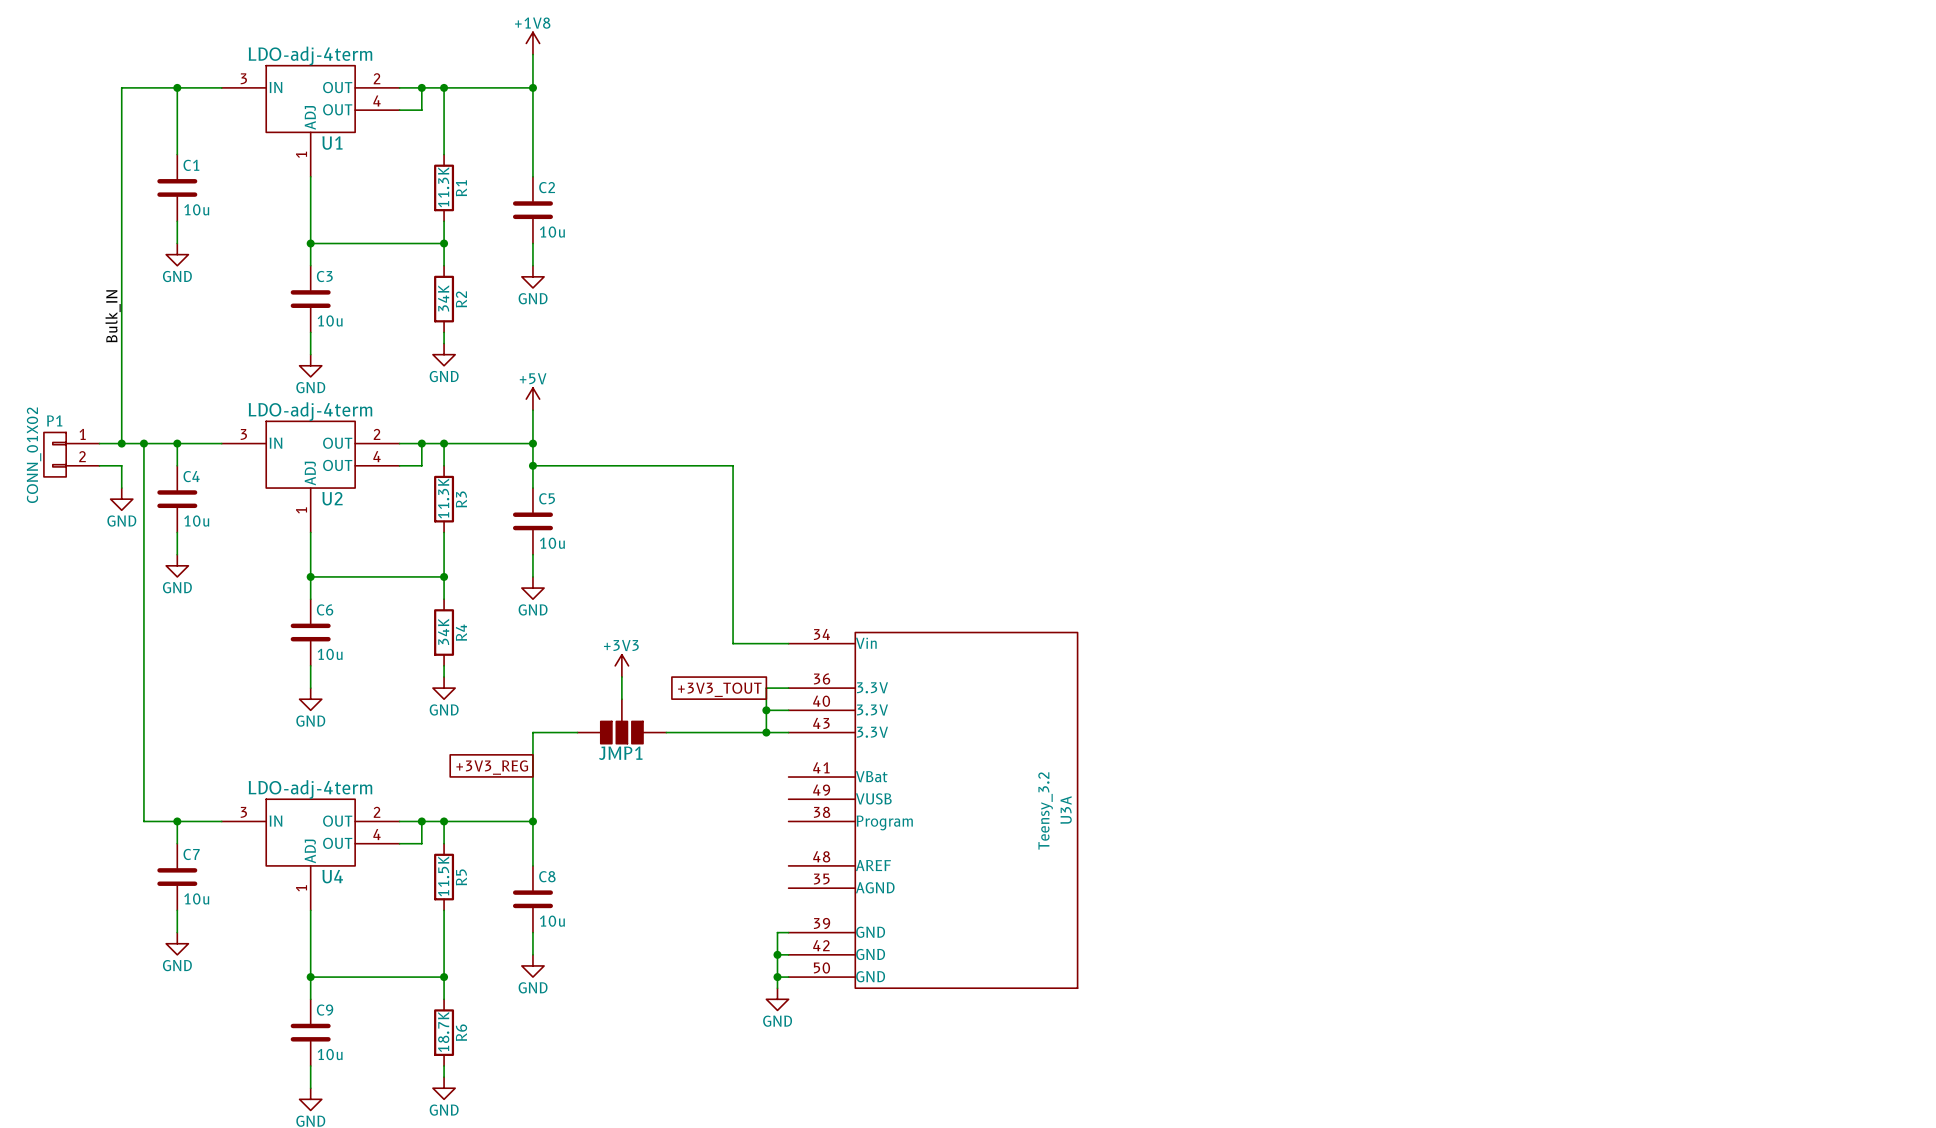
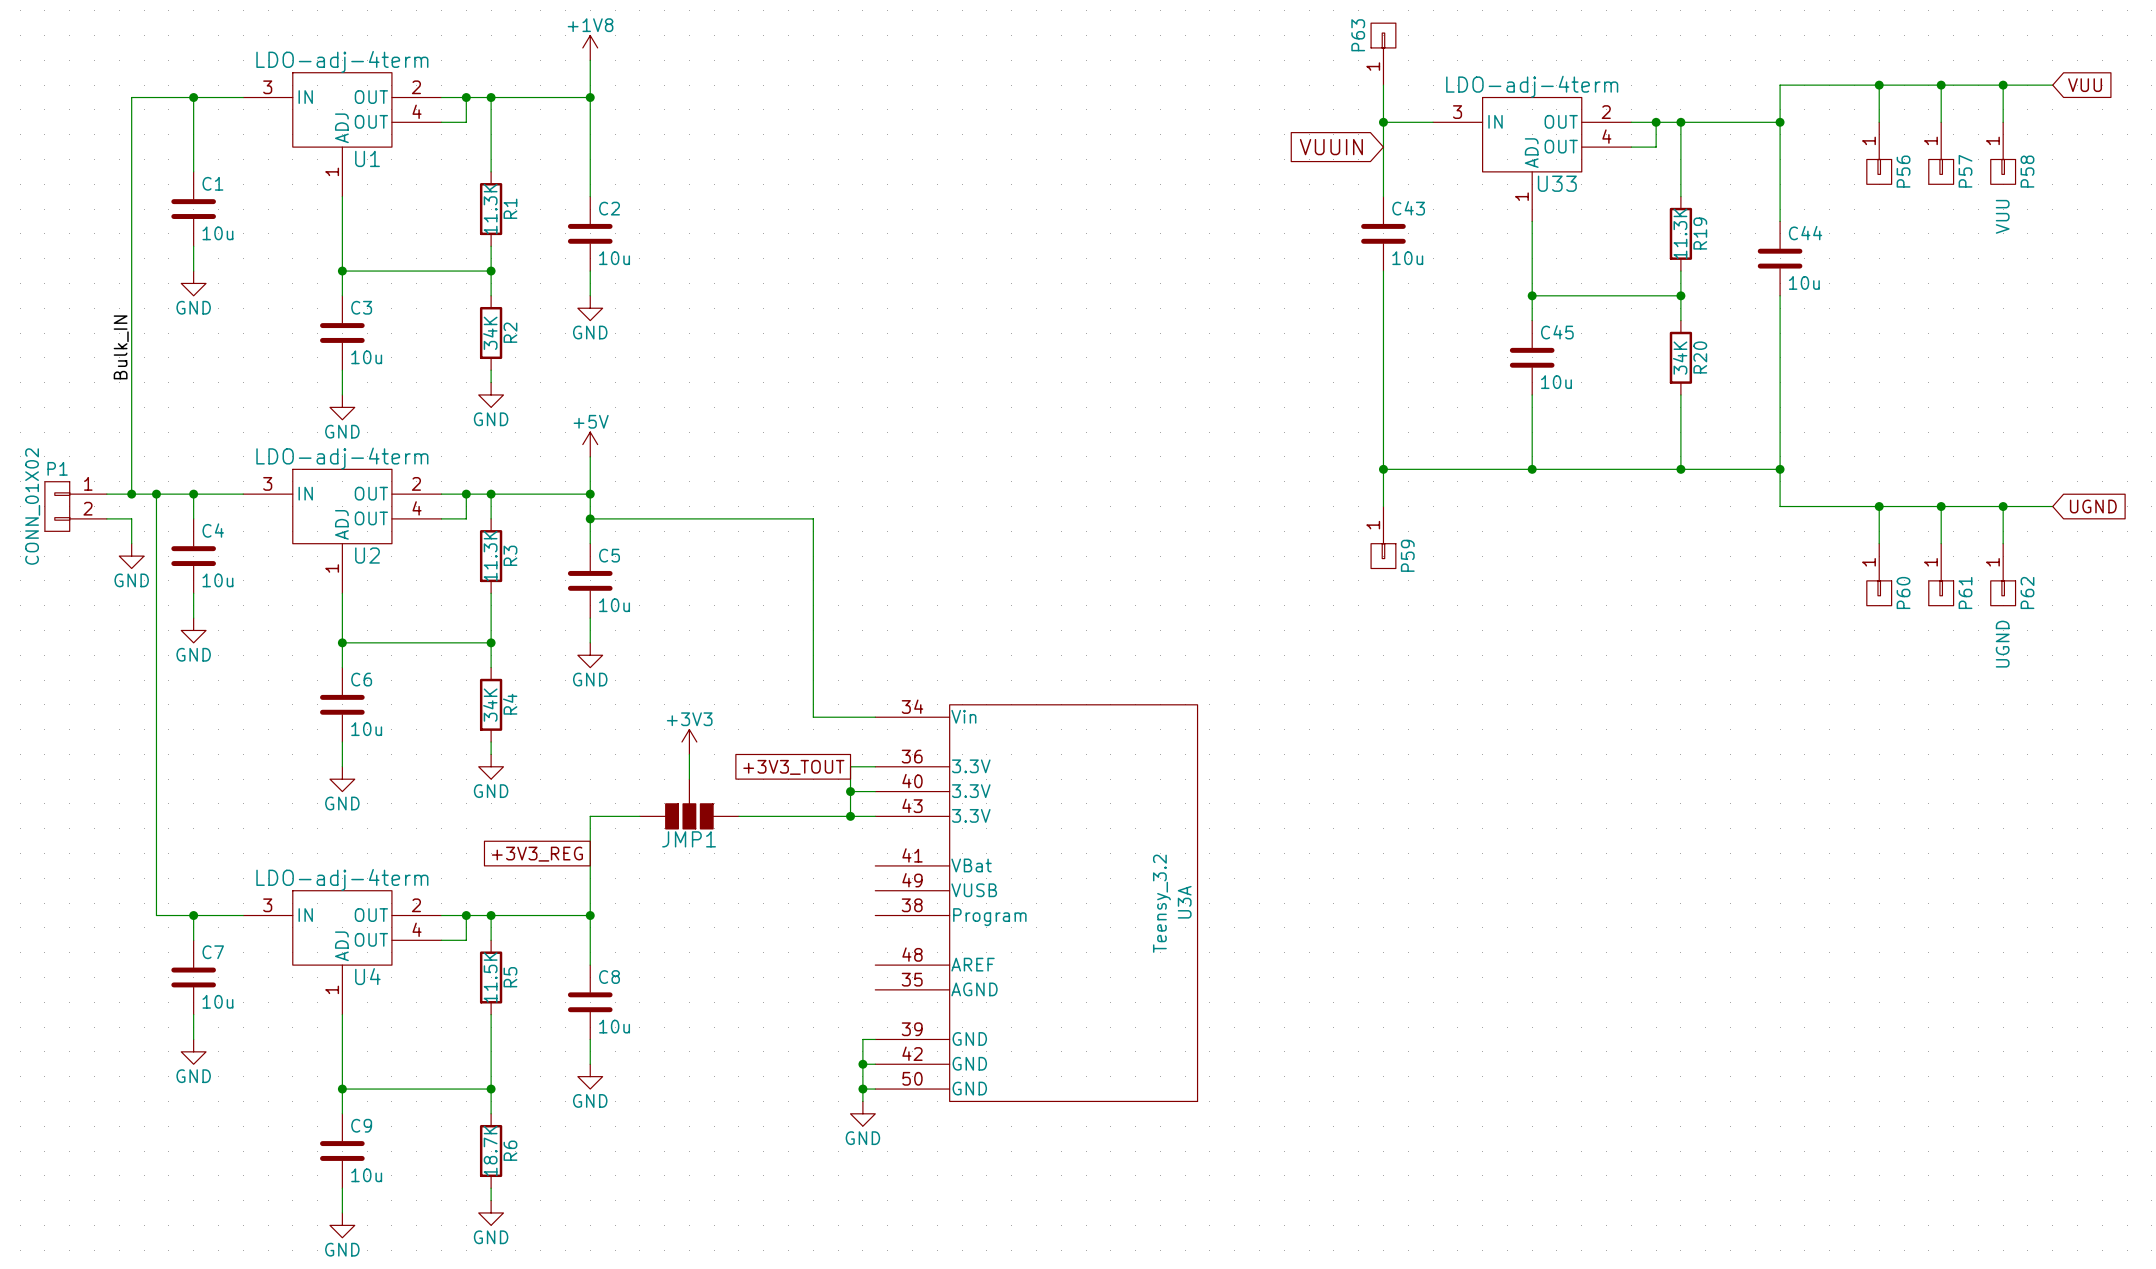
P63: none -> (1383, 54)
wire: none -> (1383, 85) (1383, 196)
wire: none -> (1879, 85) (1879, 122)
junction: none -> (1879, 85)
wire: none -> (1941, 85) (1941, 122)
junction: none -> (1941, 85)
wire: none -> (2003, 85) (2003, 122)
junction: none -> (2003, 85)
wire: none -> (2052, 85) (1780, 85) (1780, 221)
global label: none -> VUU (2085, 85)
wire: none -> (1383, 122) (1433, 122)
junction: none -> (1383, 122)
wire: none -> (1631, 122) (1780, 122)
wire: none -> (1656, 122) (1656, 147) (1631, 147)
junction: none -> (1656, 122)
wire: none -> (1680, 122) (1680, 196)
junction: none -> (1680, 122)
junction: none -> (1780, 122)
global label: none -> VUUIN (1331, 147)
P56: none -> (1879, 153)
P57: none -> (1941, 153)
P58: none -> VUU (2003, 153)
U33: none -> LDO-adj-4term (1532, 159)
wire: none -> (1532, 221) (1532, 320)
C43: none -> 10u (1383, 233)
R19: none -> 11.3K (1680, 233)
C44: none -> 10u (1780, 258)
wire: none -> (1383, 271) (1383, 506)
wire: none -> (1680, 271) (1680, 320)
wire: none -> (1532, 295) (1680, 295)
junction: none -> (1532, 295)
junction: none -> (1680, 295)
wire: none -> (1780, 295) (1780, 506) (2052, 506)
C45: none -> 10u (1532, 357)
R20: none -> 34K (1680, 357)
wire: none -> (1532, 394) (1532, 469)
wire: none -> (1680, 394) (1680, 469)
wire: none -> (1383, 469) (1780, 469)
junction: none -> (1383, 469)
junction: none -> (1532, 469)
junction: none -> (1680, 469)
junction: none -> (1780, 469)
wire: none -> (1879, 506) (1879, 543)
junction: none -> (1879, 506)
wire: none -> (1941, 506) (1941, 543)
junction: none -> (1941, 506)
wire: none -> (2003, 506) (2003, 543)
junction: none -> (2003, 506)
global label: none -> UGND (2093, 506)
P59: none -> (1383, 537)
P60: none -> (1879, 574)
P61: none -> (1941, 574)
P62: none -> UGND (2003, 574)

